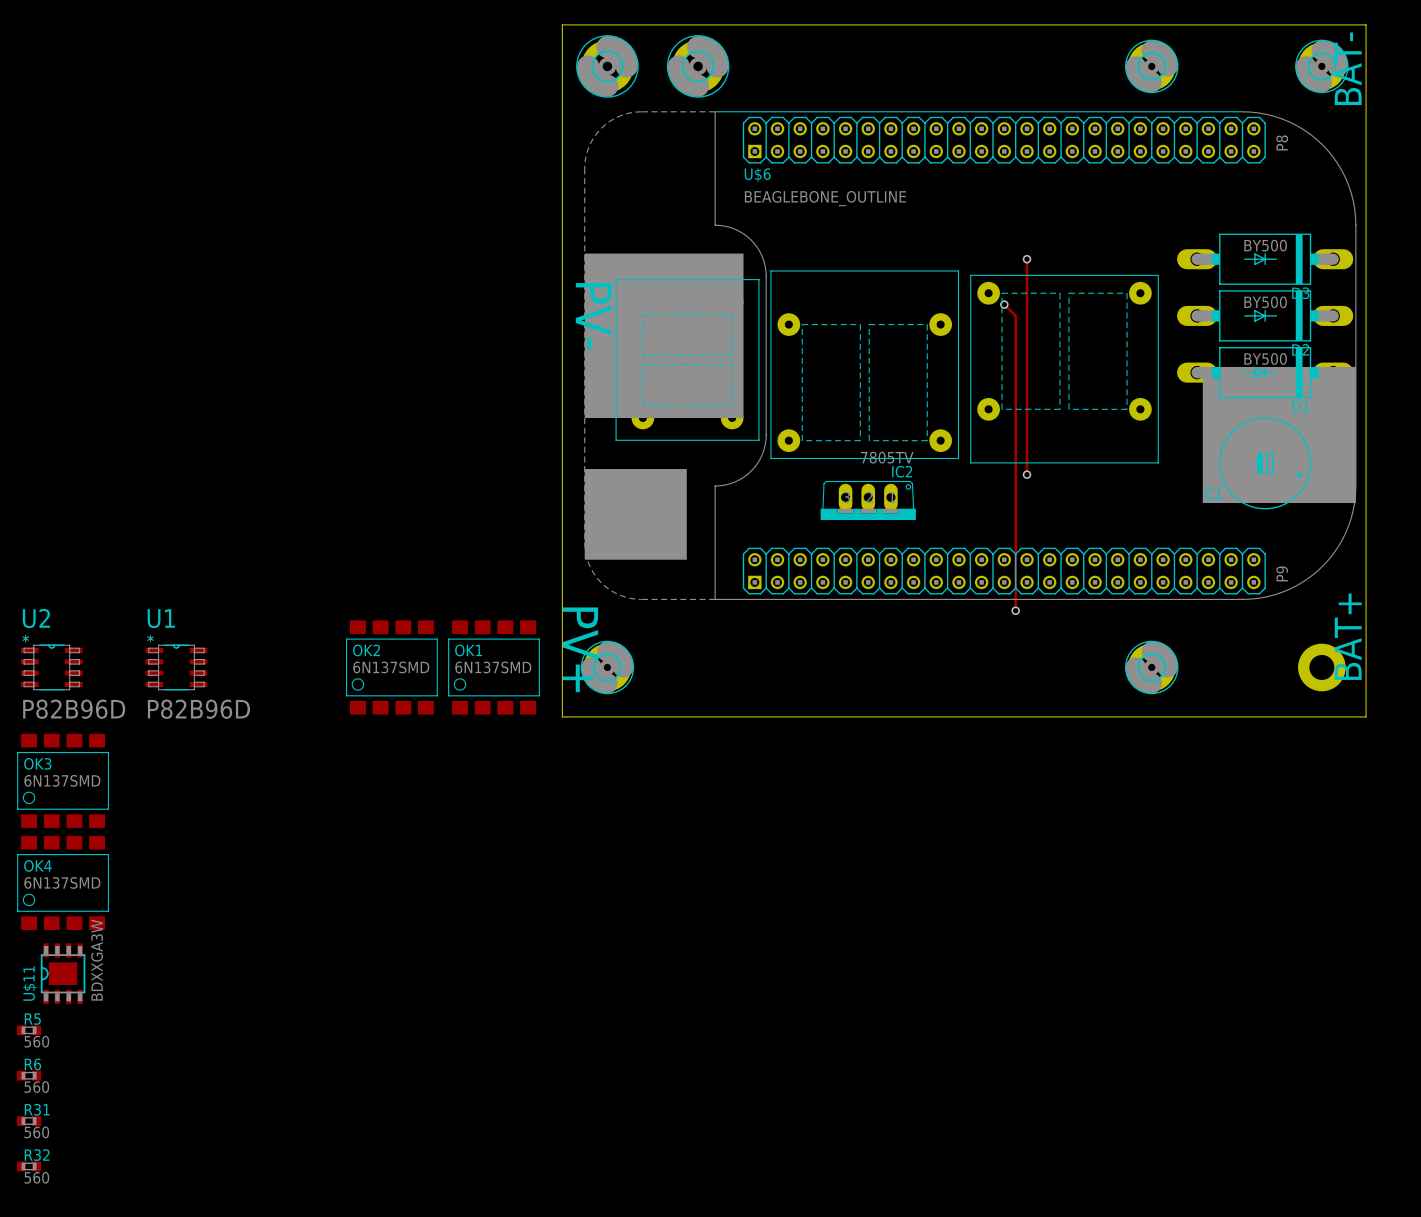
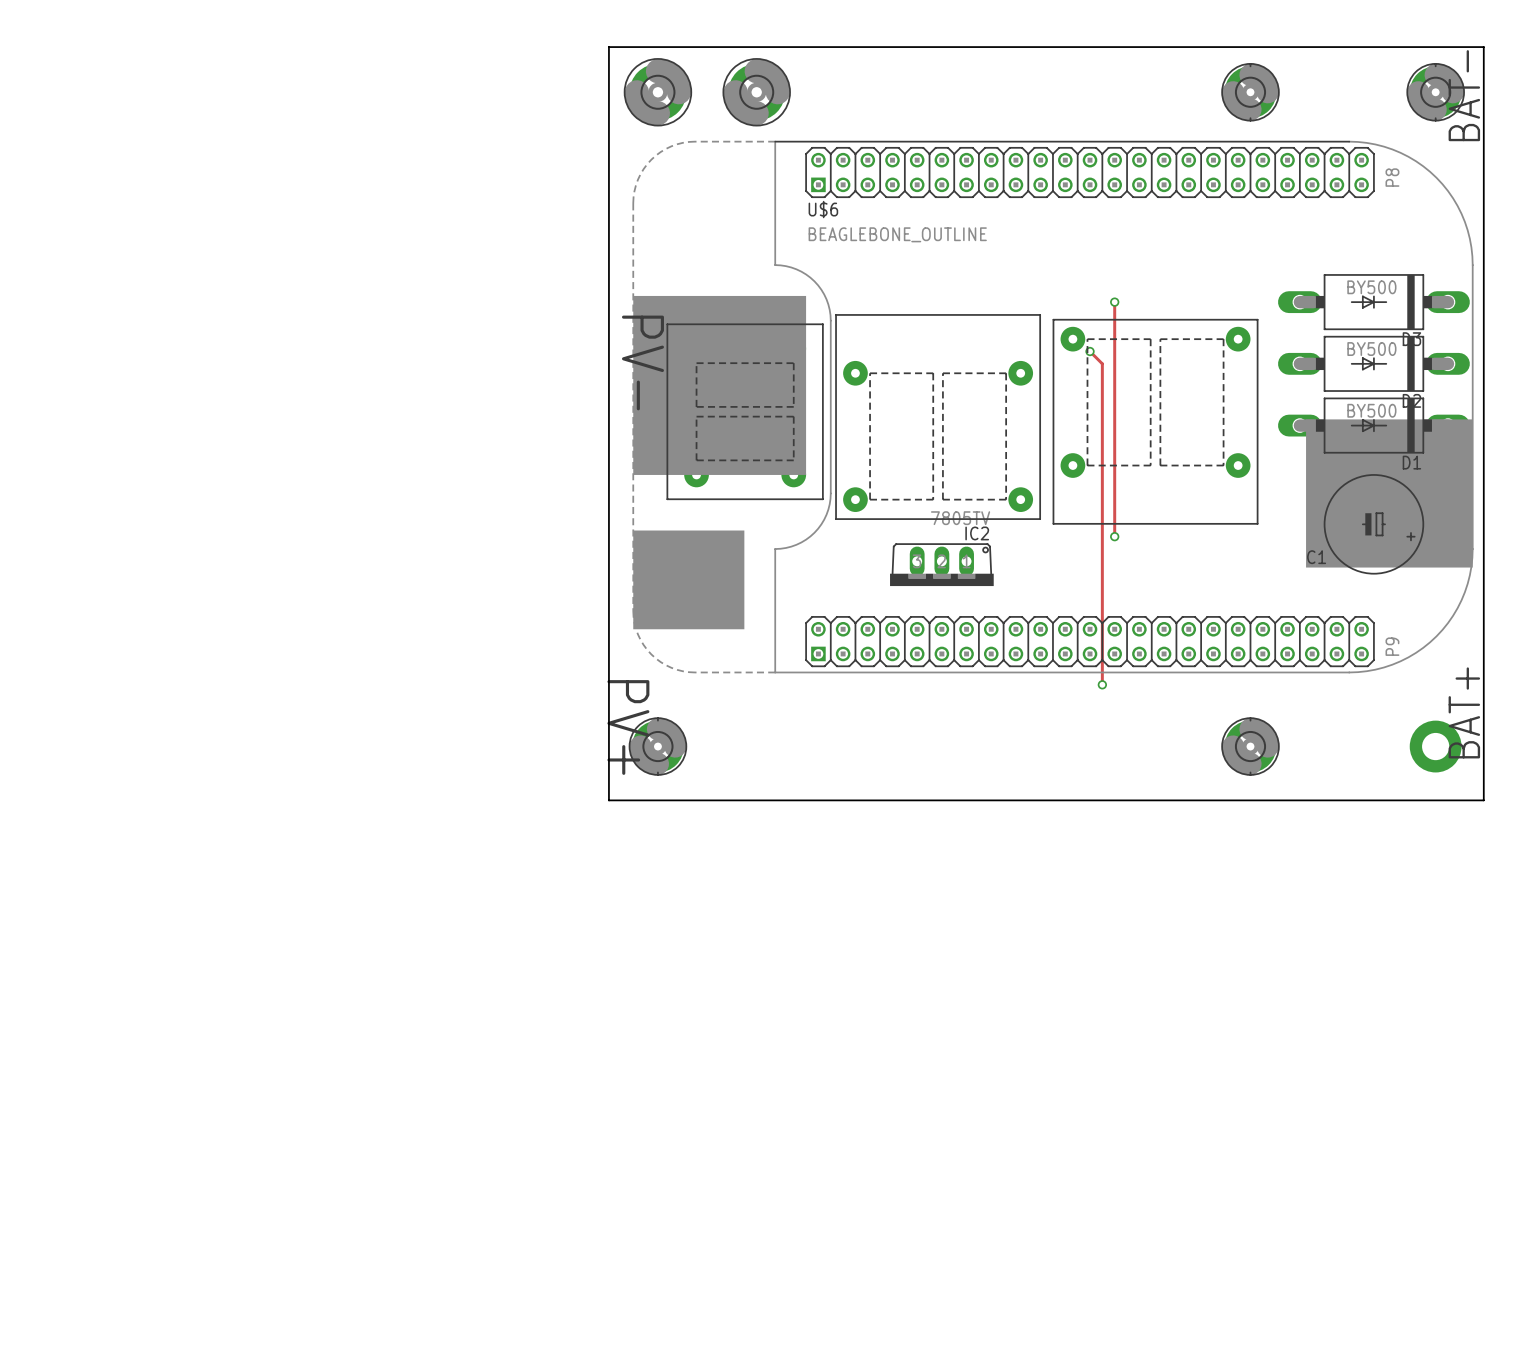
U2: P82B96D (51, 667) -> none
U1: P82B96D (176, 667) -> none
OK2: 6N137SMD (391, 667) -> none
OK1: 6N137SMD (494, 667) -> none
OK3: 6N137SMD (63, 780) -> none
OK4: 6N137SMD (63, 882) -> none
U$11: BDXXGA3W (63, 973) -> none
R5: 560 (29, 1030) -> none
R6: 560 (29, 1075) -> none
R31: 560 (29, 1121) -> none
R32: 560 (29, 1166) -> none

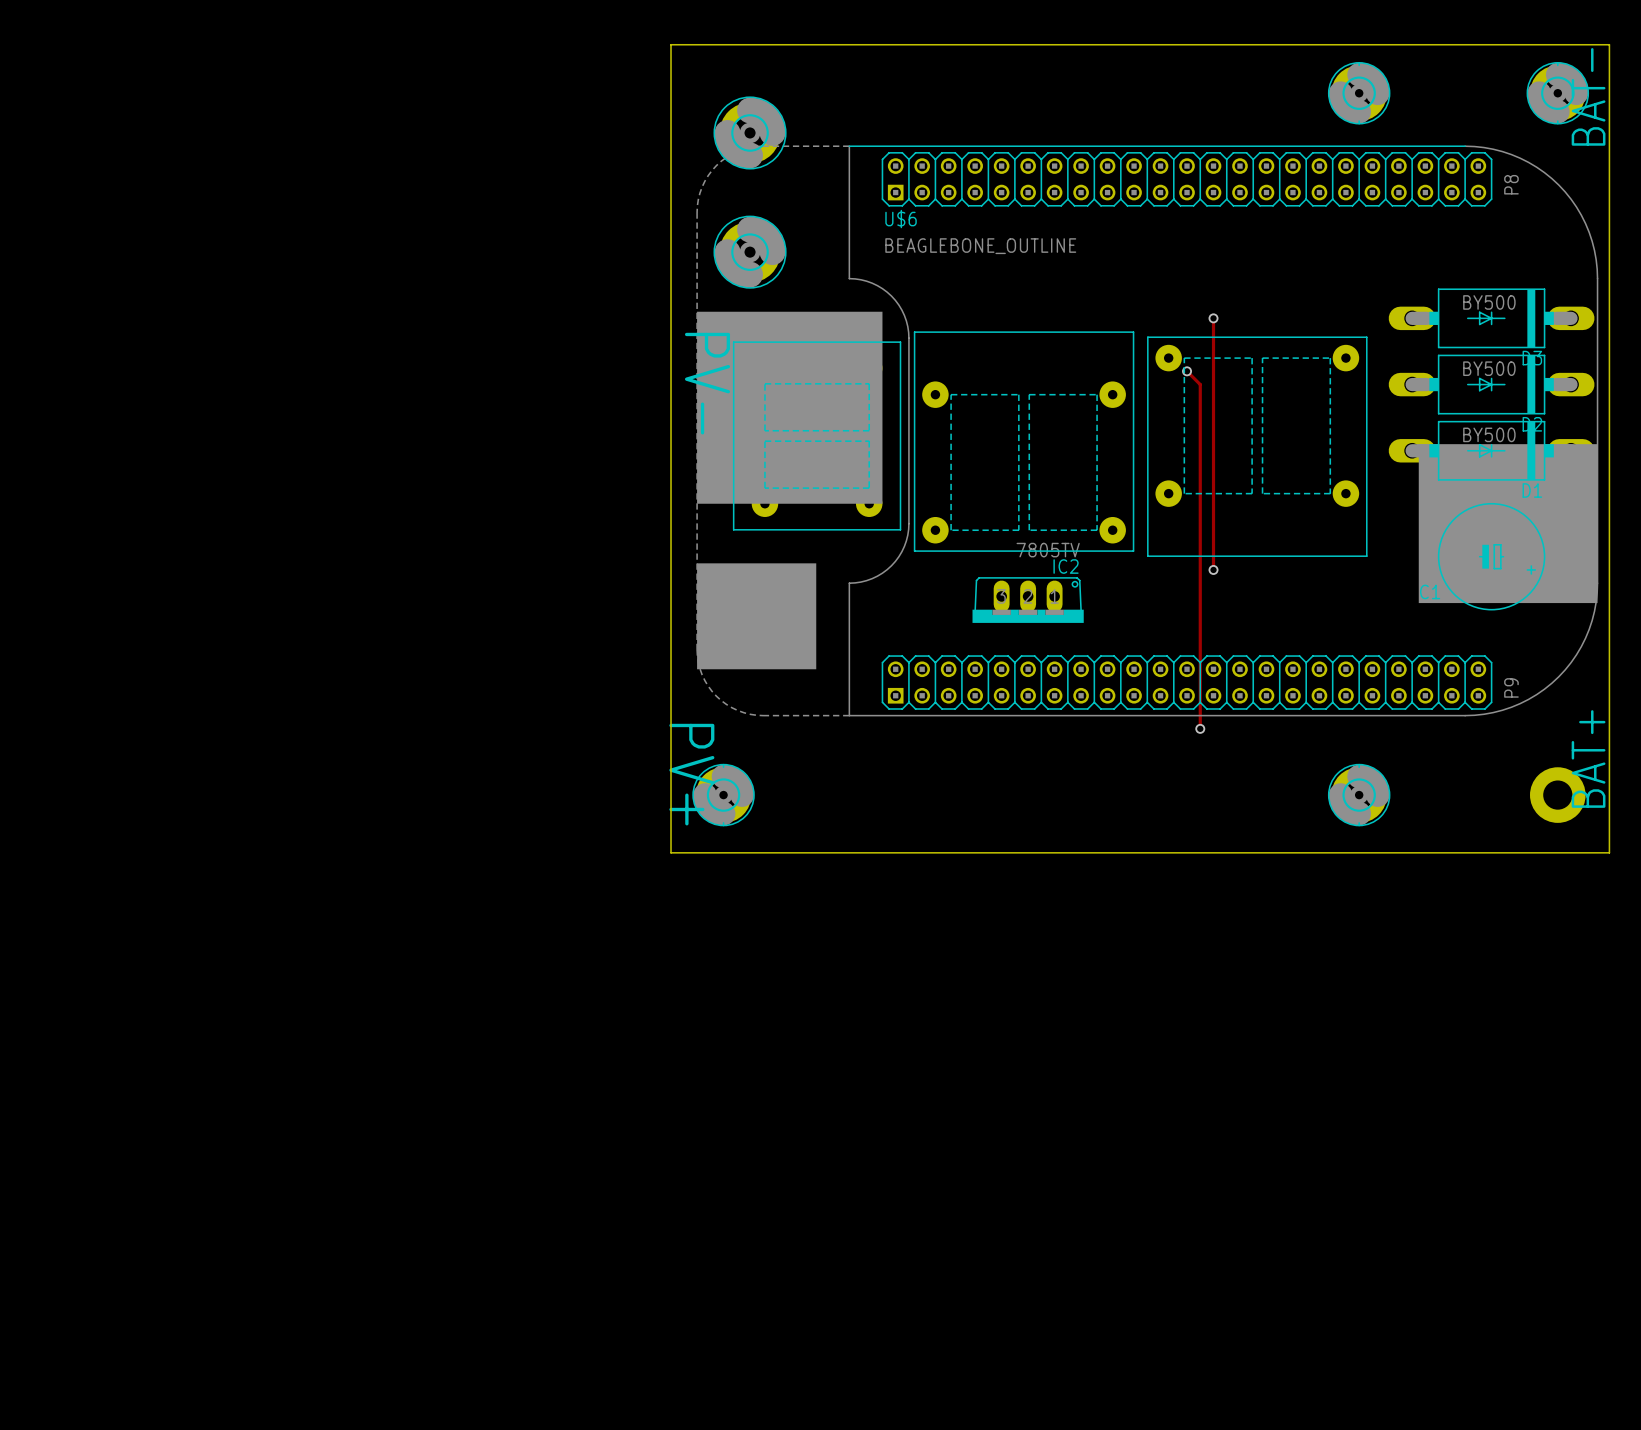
part: (657, 92) -> none
part: (756, 92) -> none
part: none -> (750, 132)
part: none -> (750, 252)

